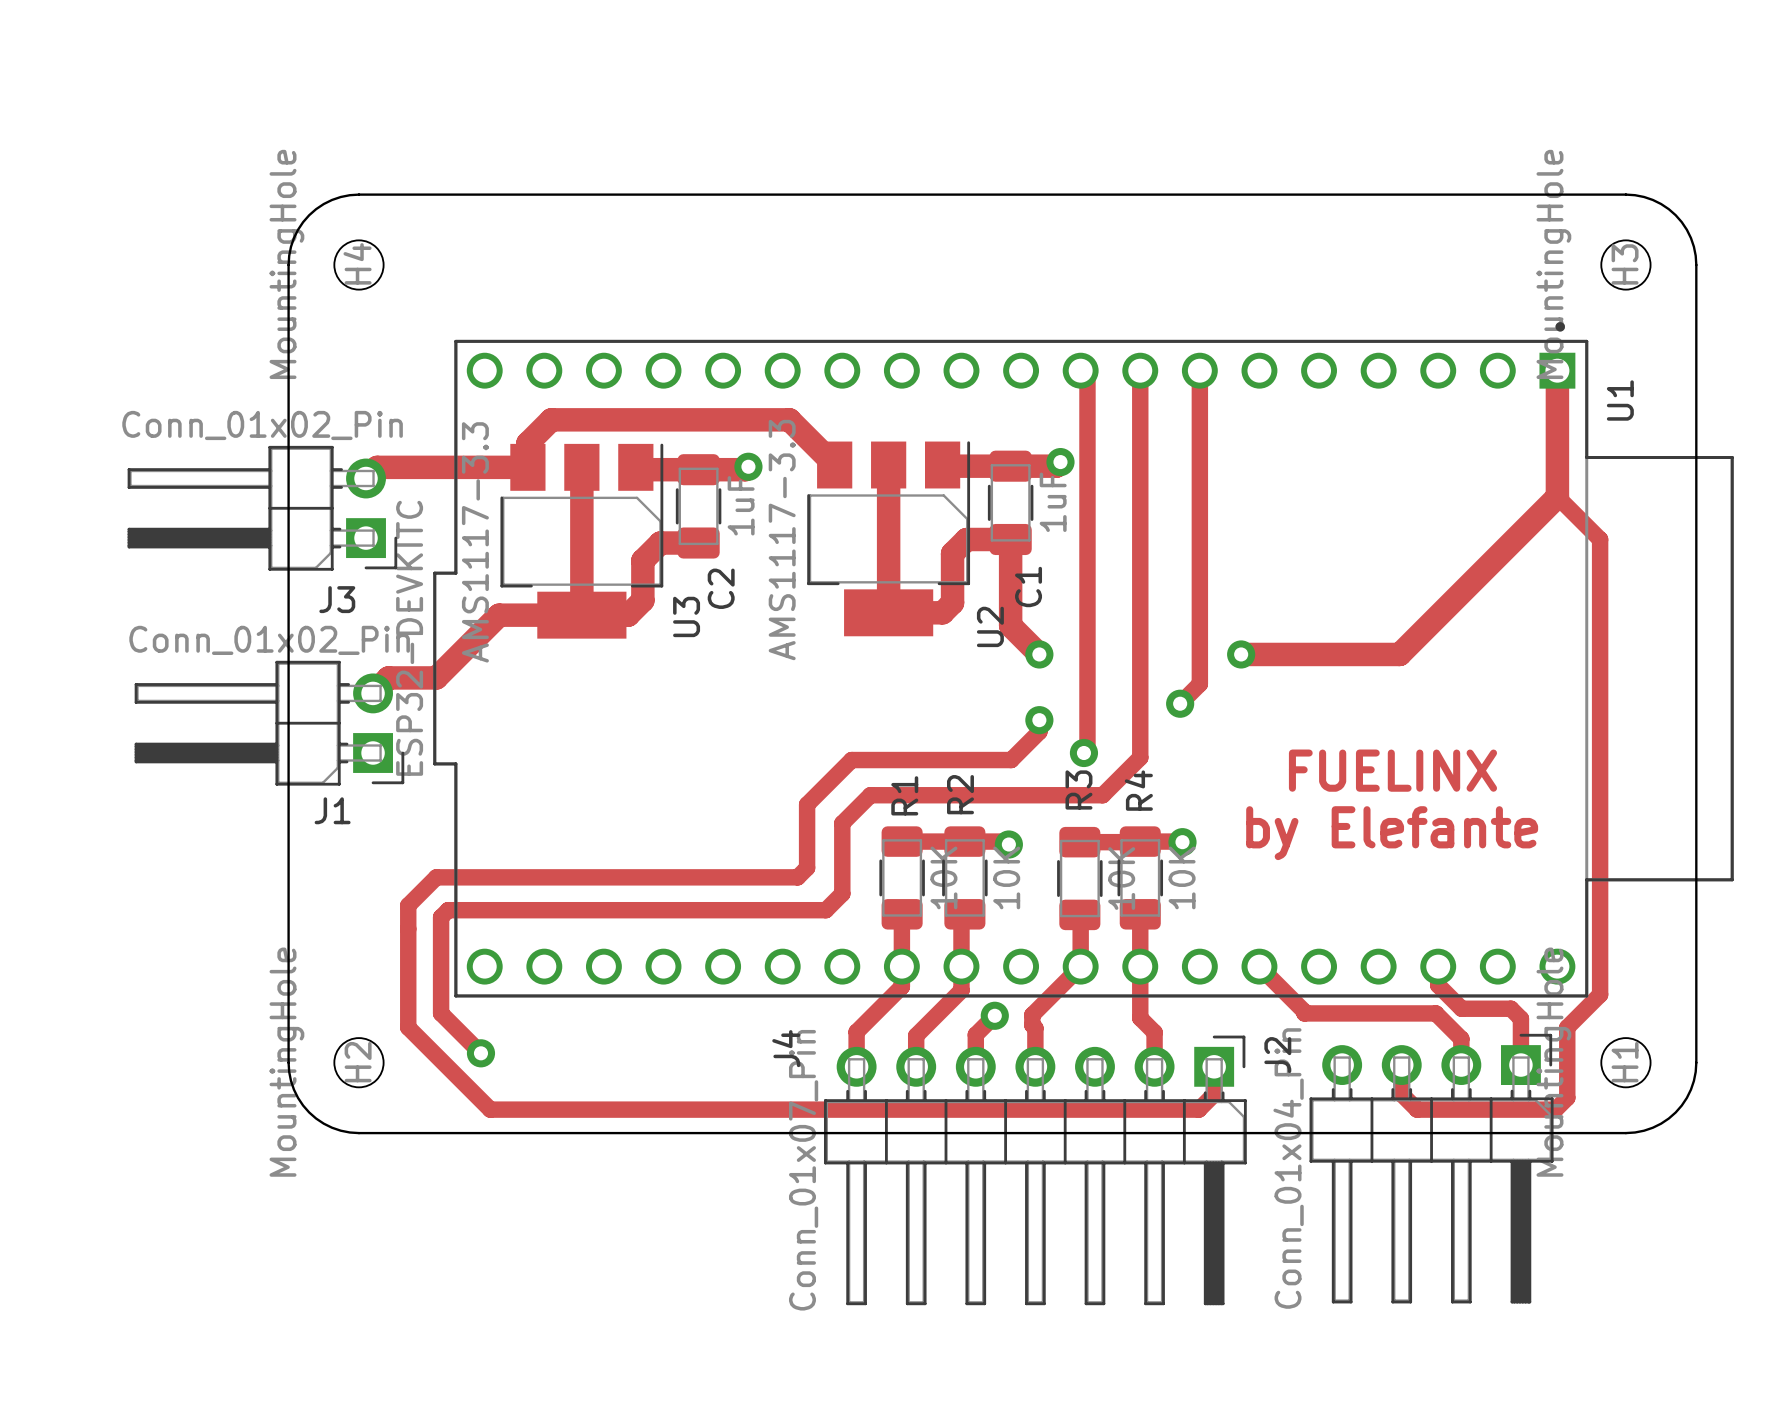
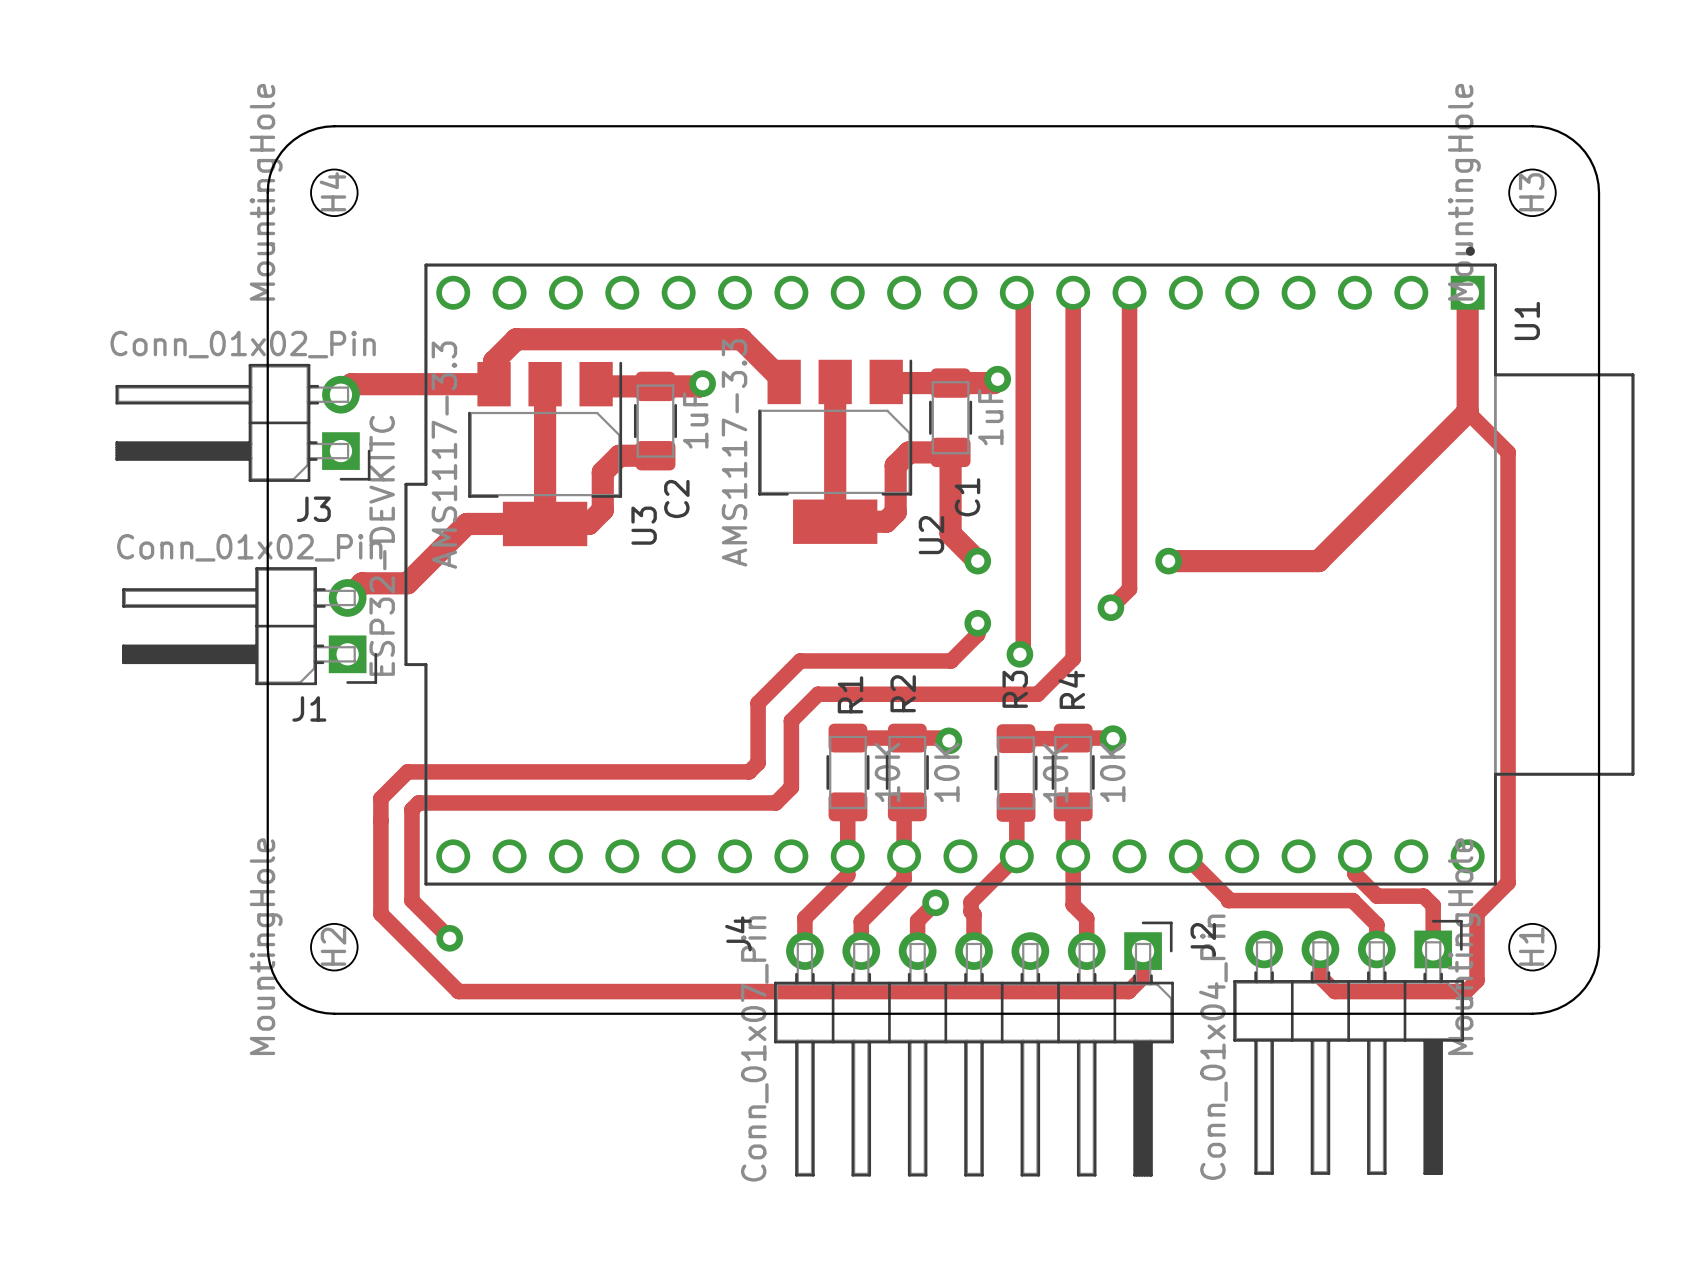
text: FUELINX (1392, 770) -> none
text: by Elefante (1392, 833) -> none

